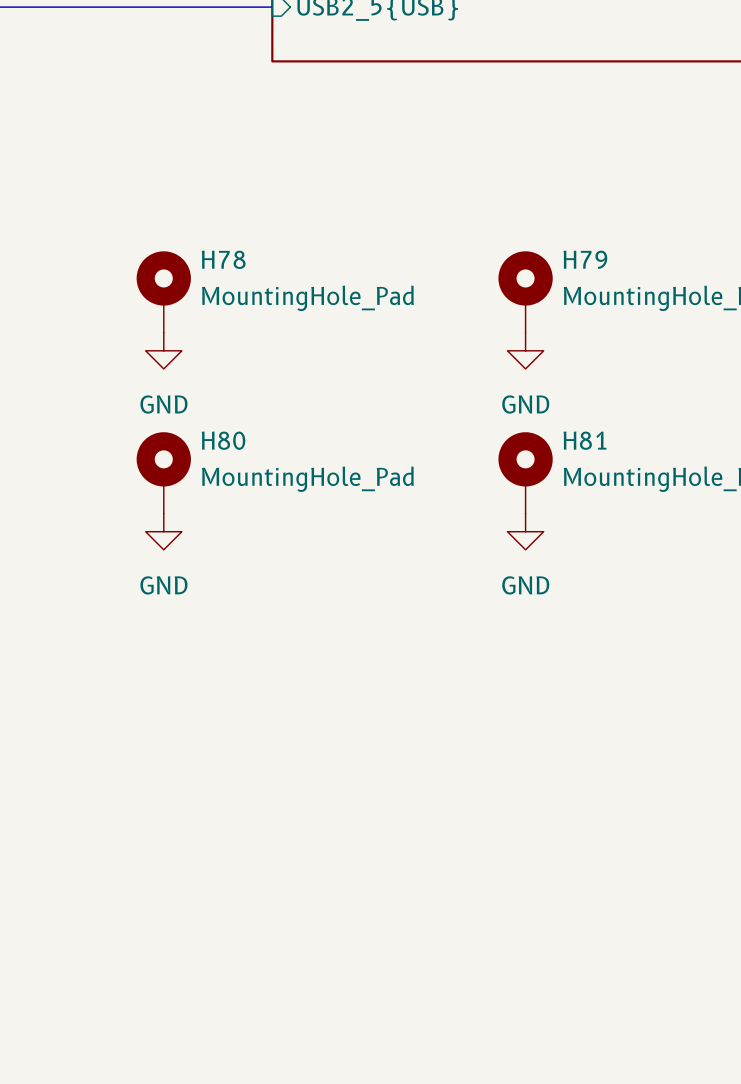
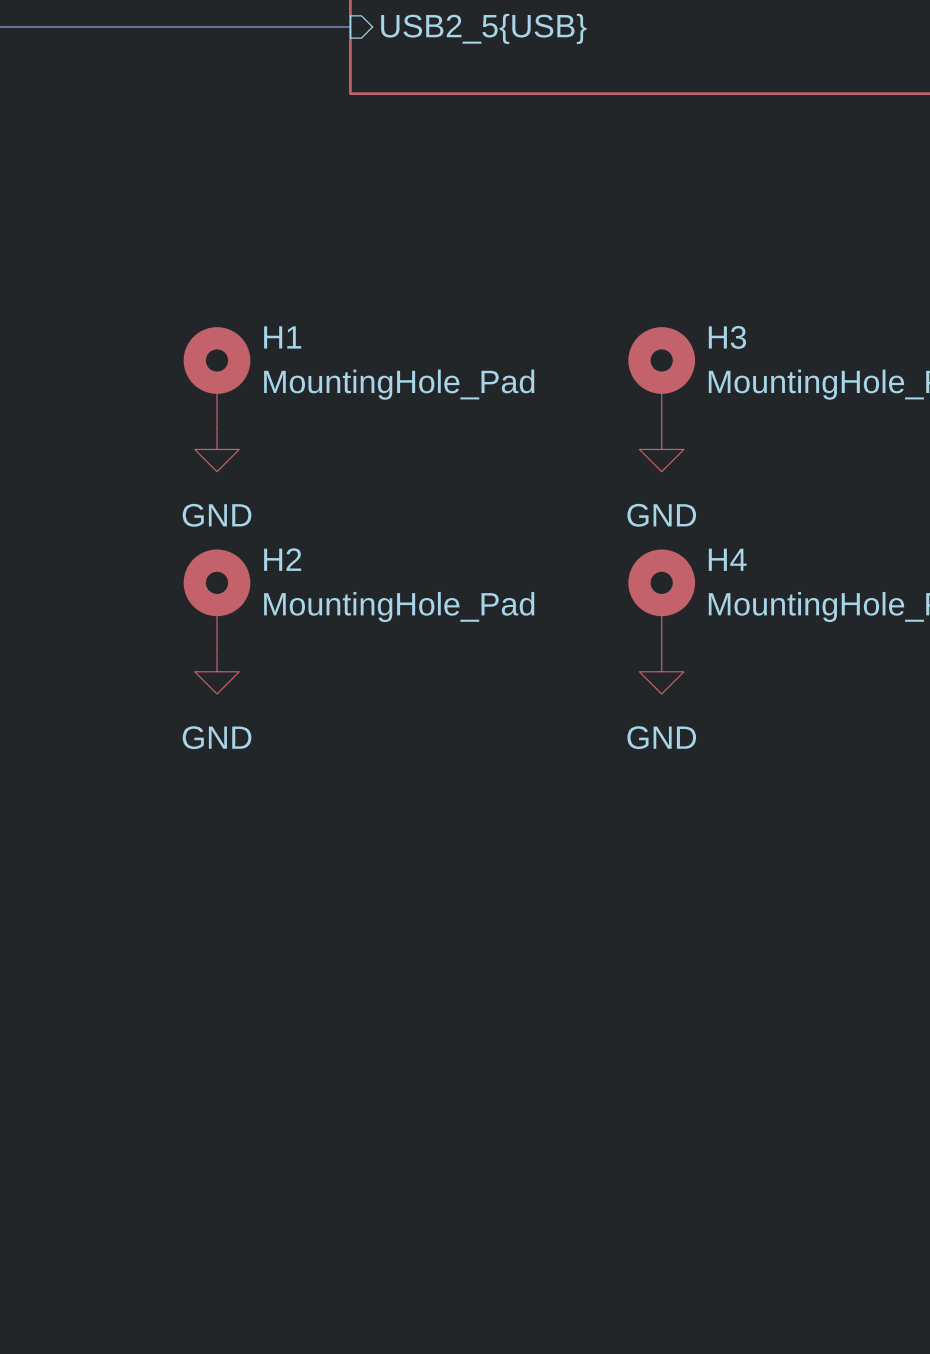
H78 name: H78 (223, 259) -> H1 (282, 337)
H79 name: H79 (585, 259) -> H3 (727, 337)
H80 name: H80 (223, 440) -> H2 (282, 559)
H81 name: H81 (584, 440) -> H4 (727, 559)

